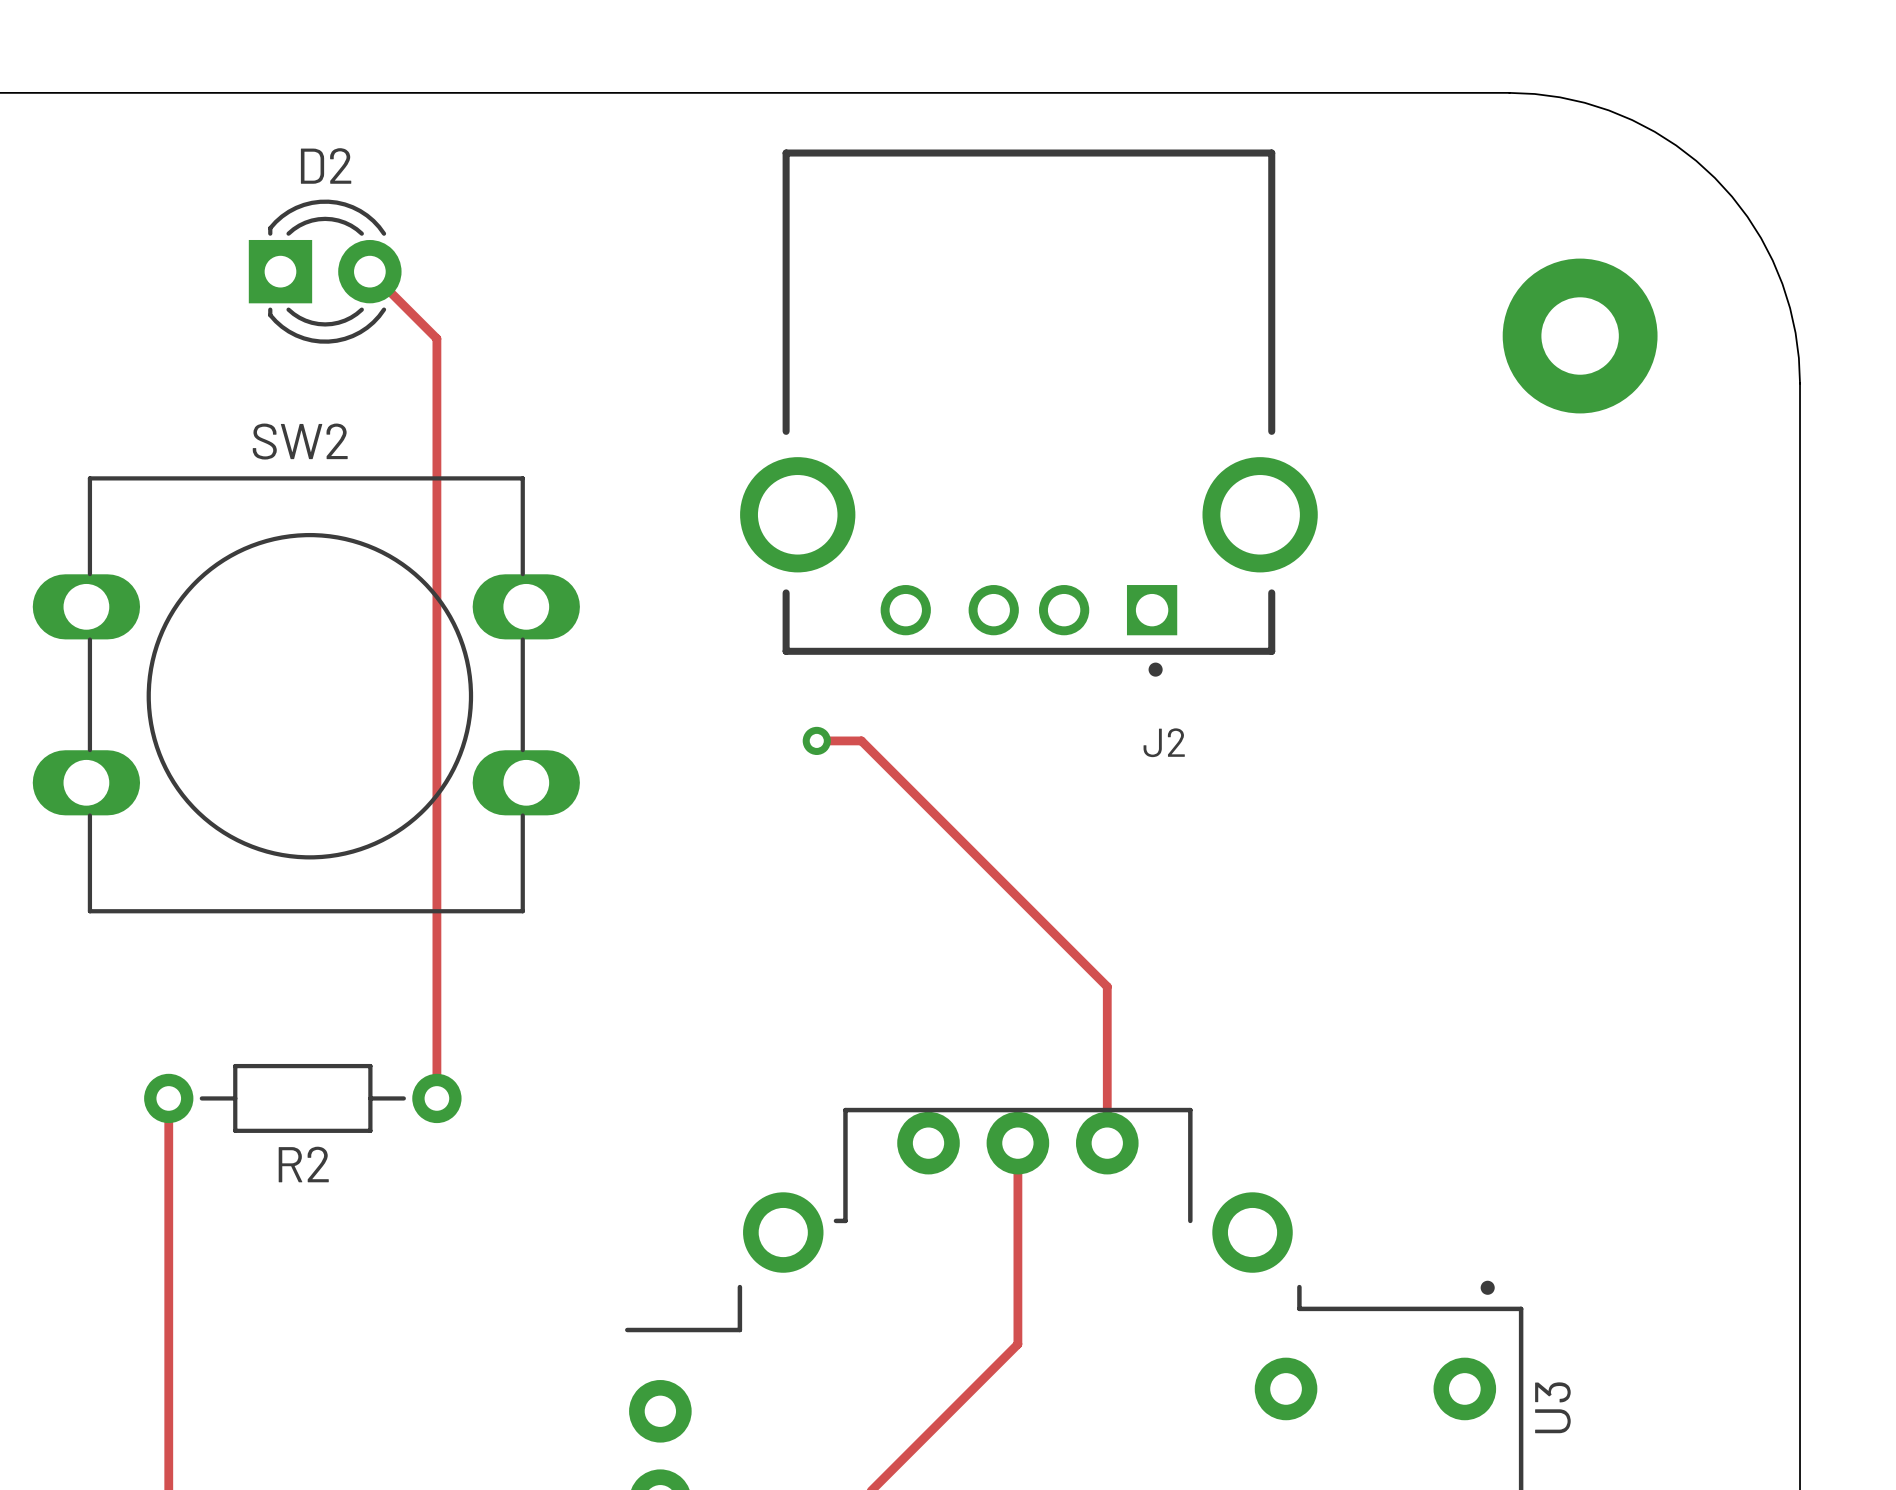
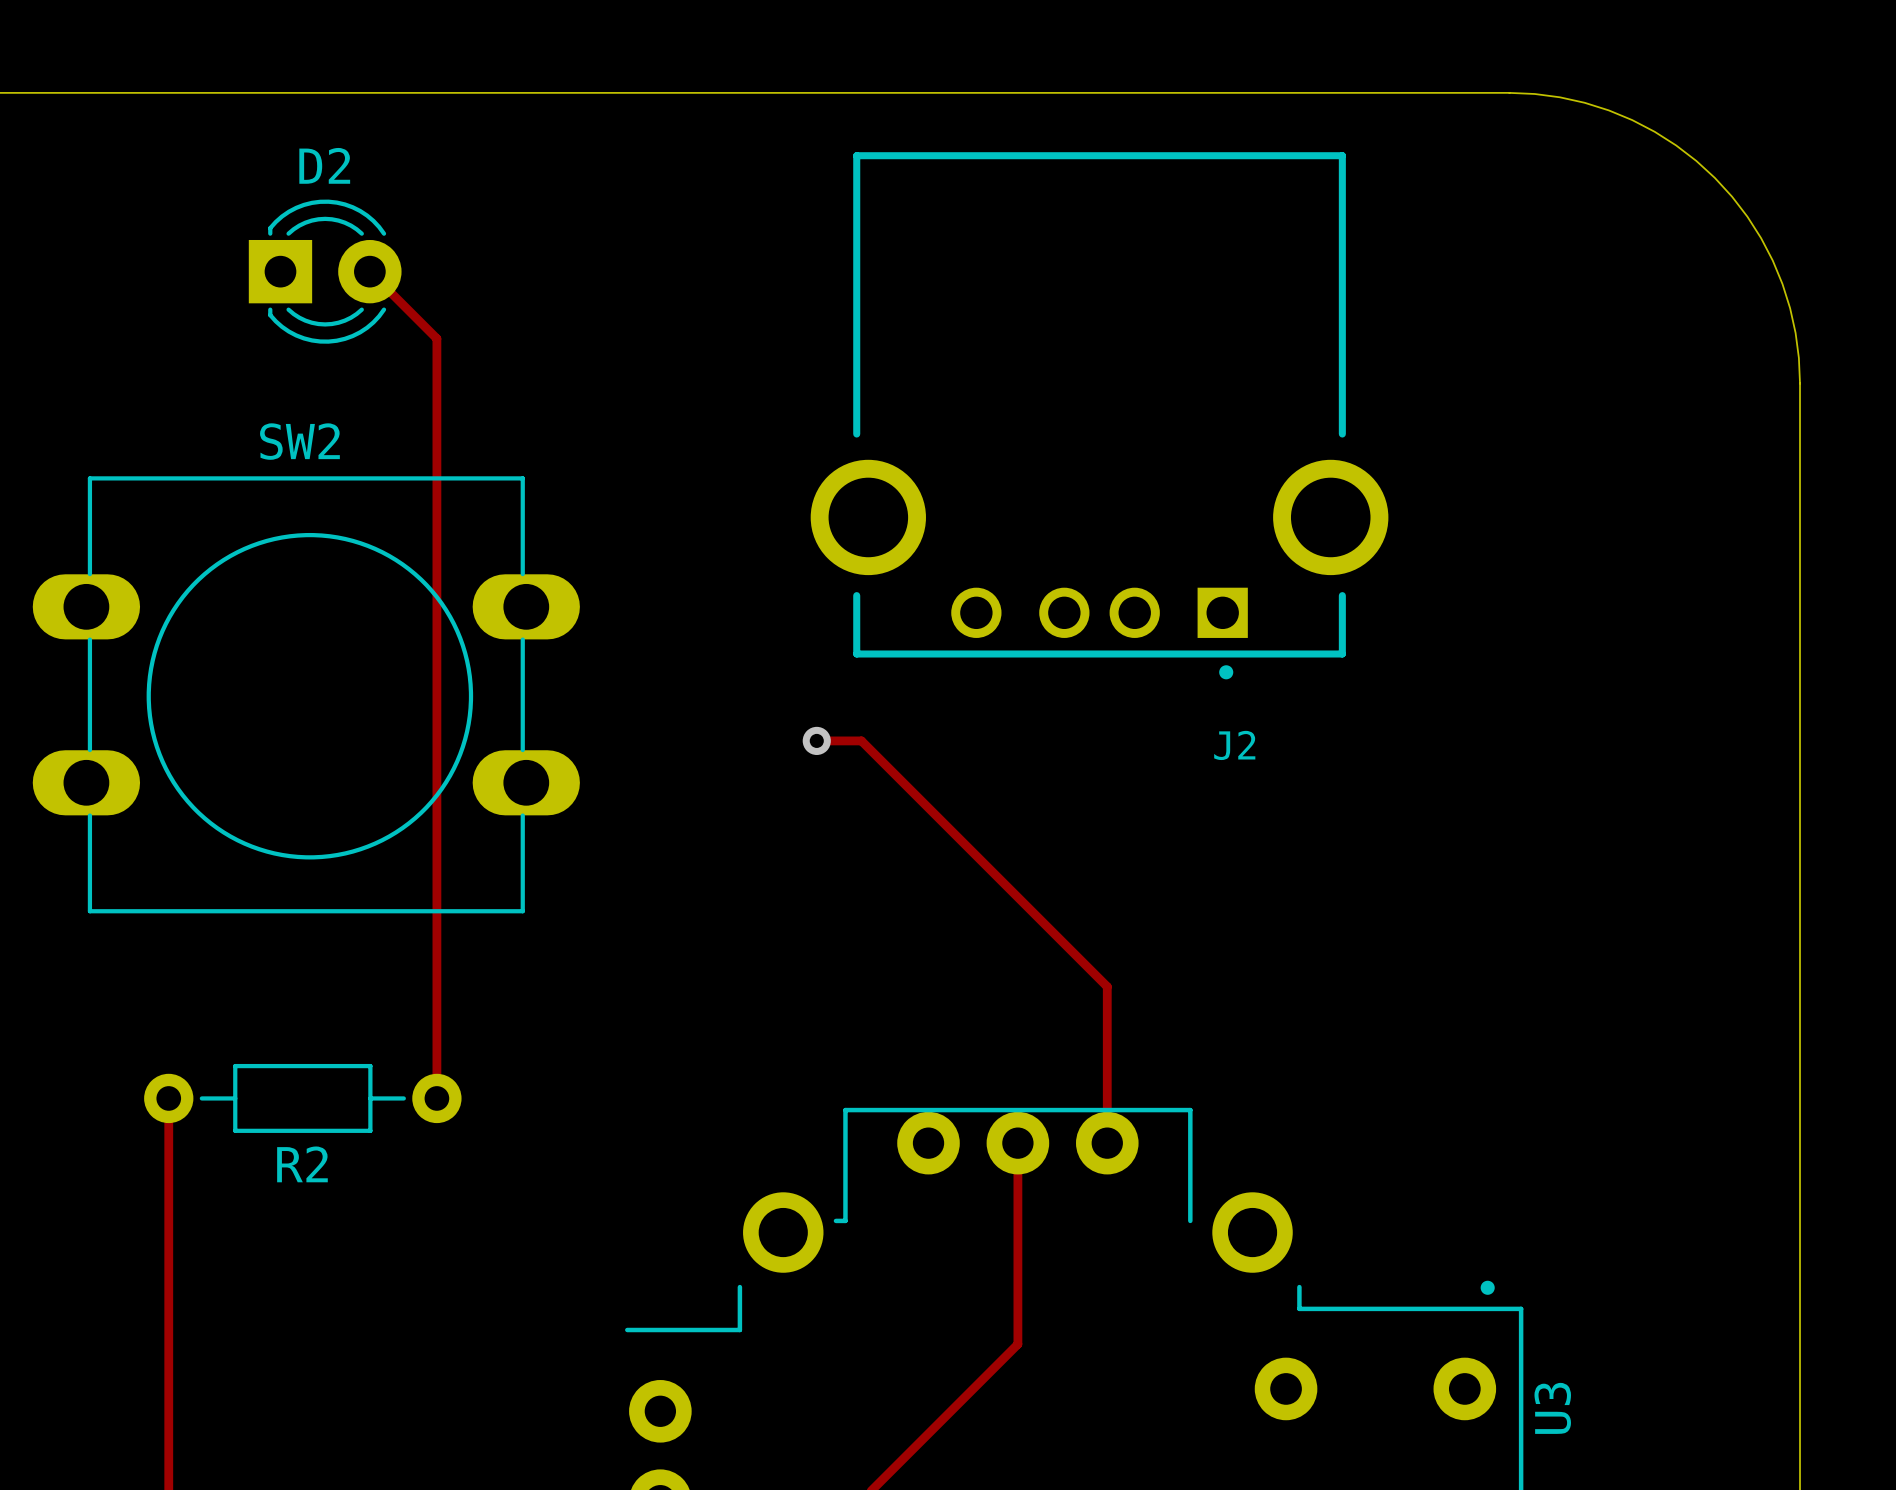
part: (1580, 336) -> none
J2 position: (1028, 413) -> (1099, 415)

